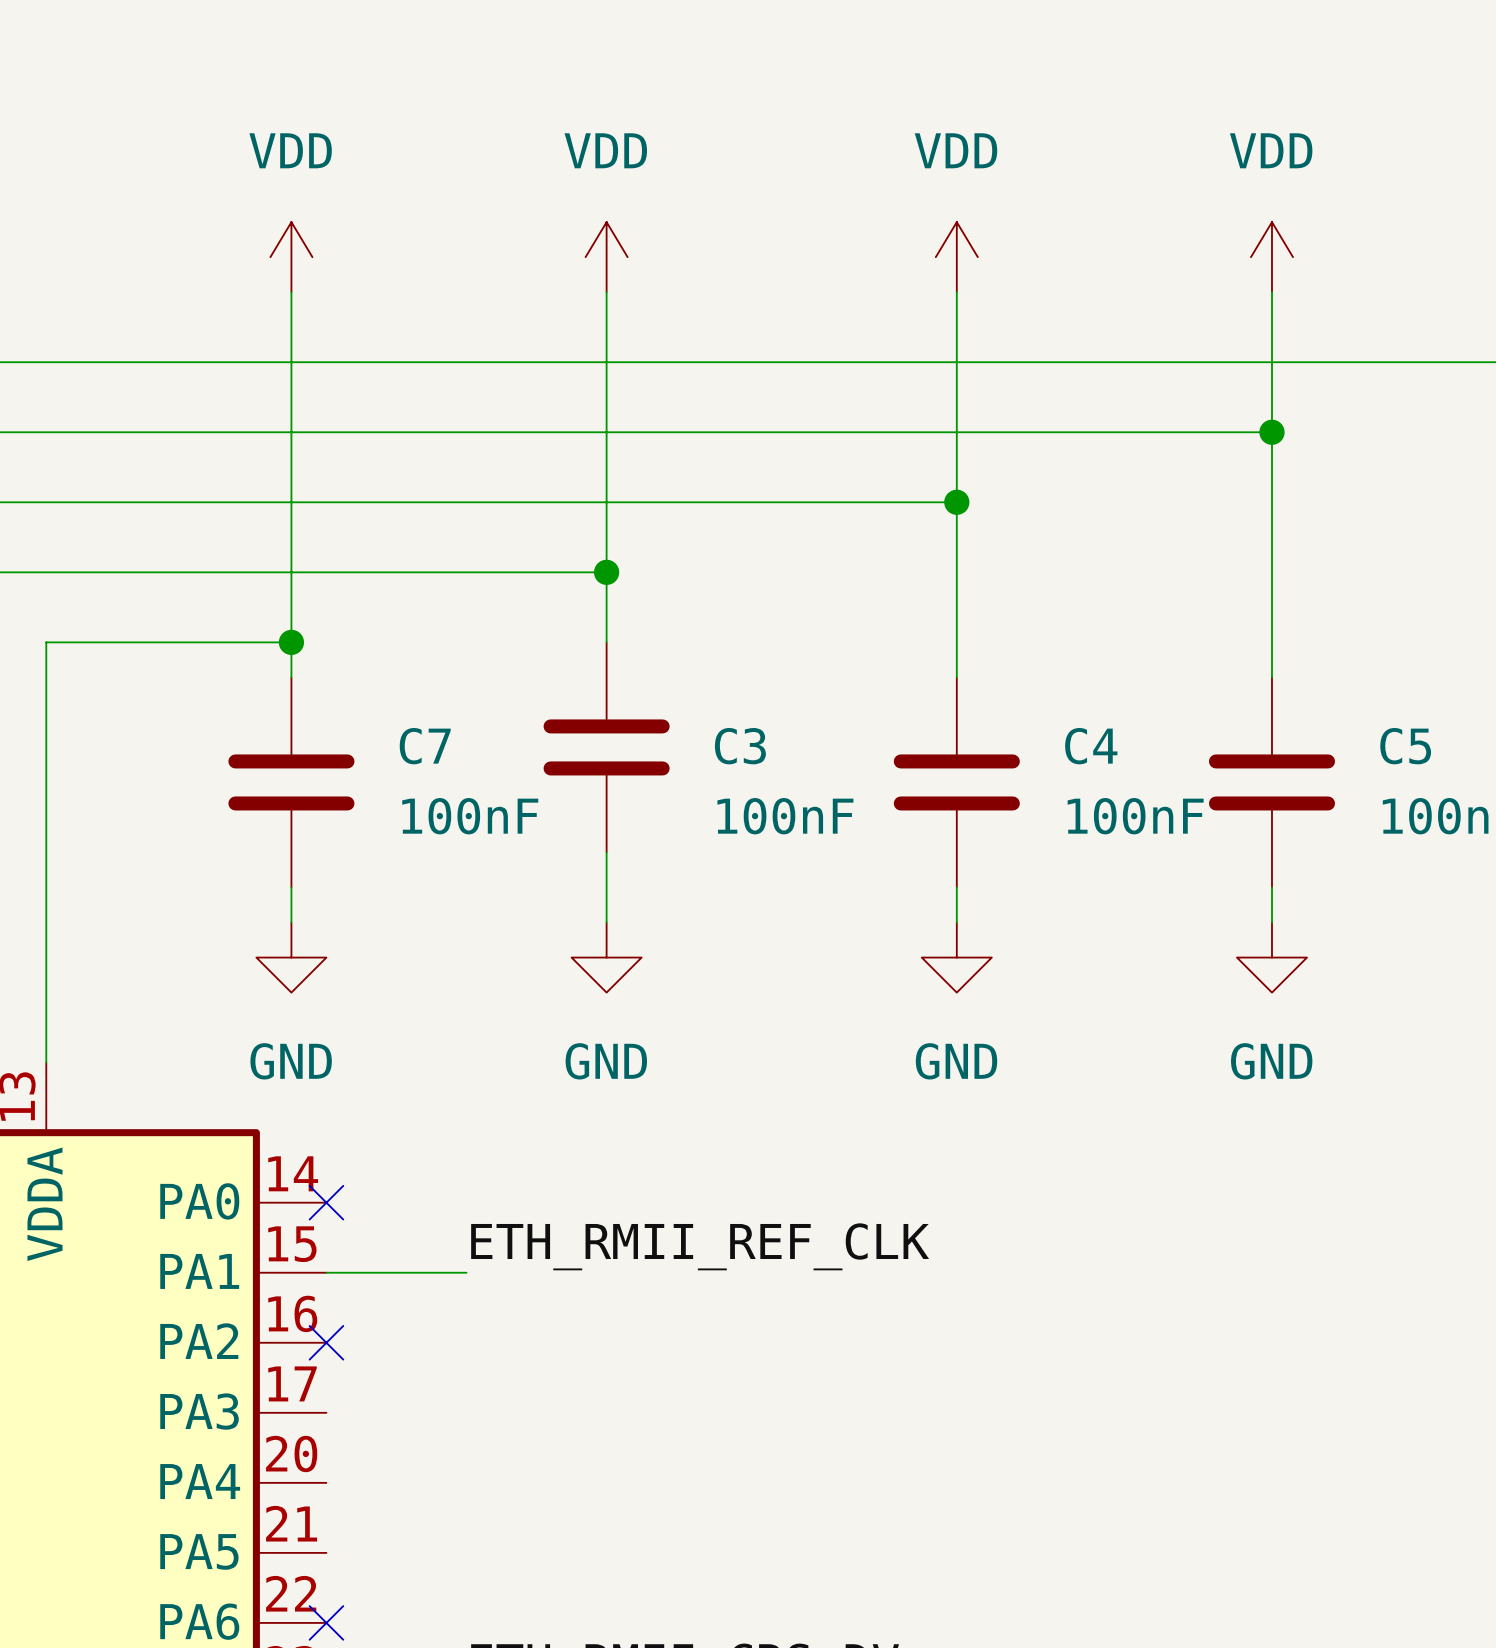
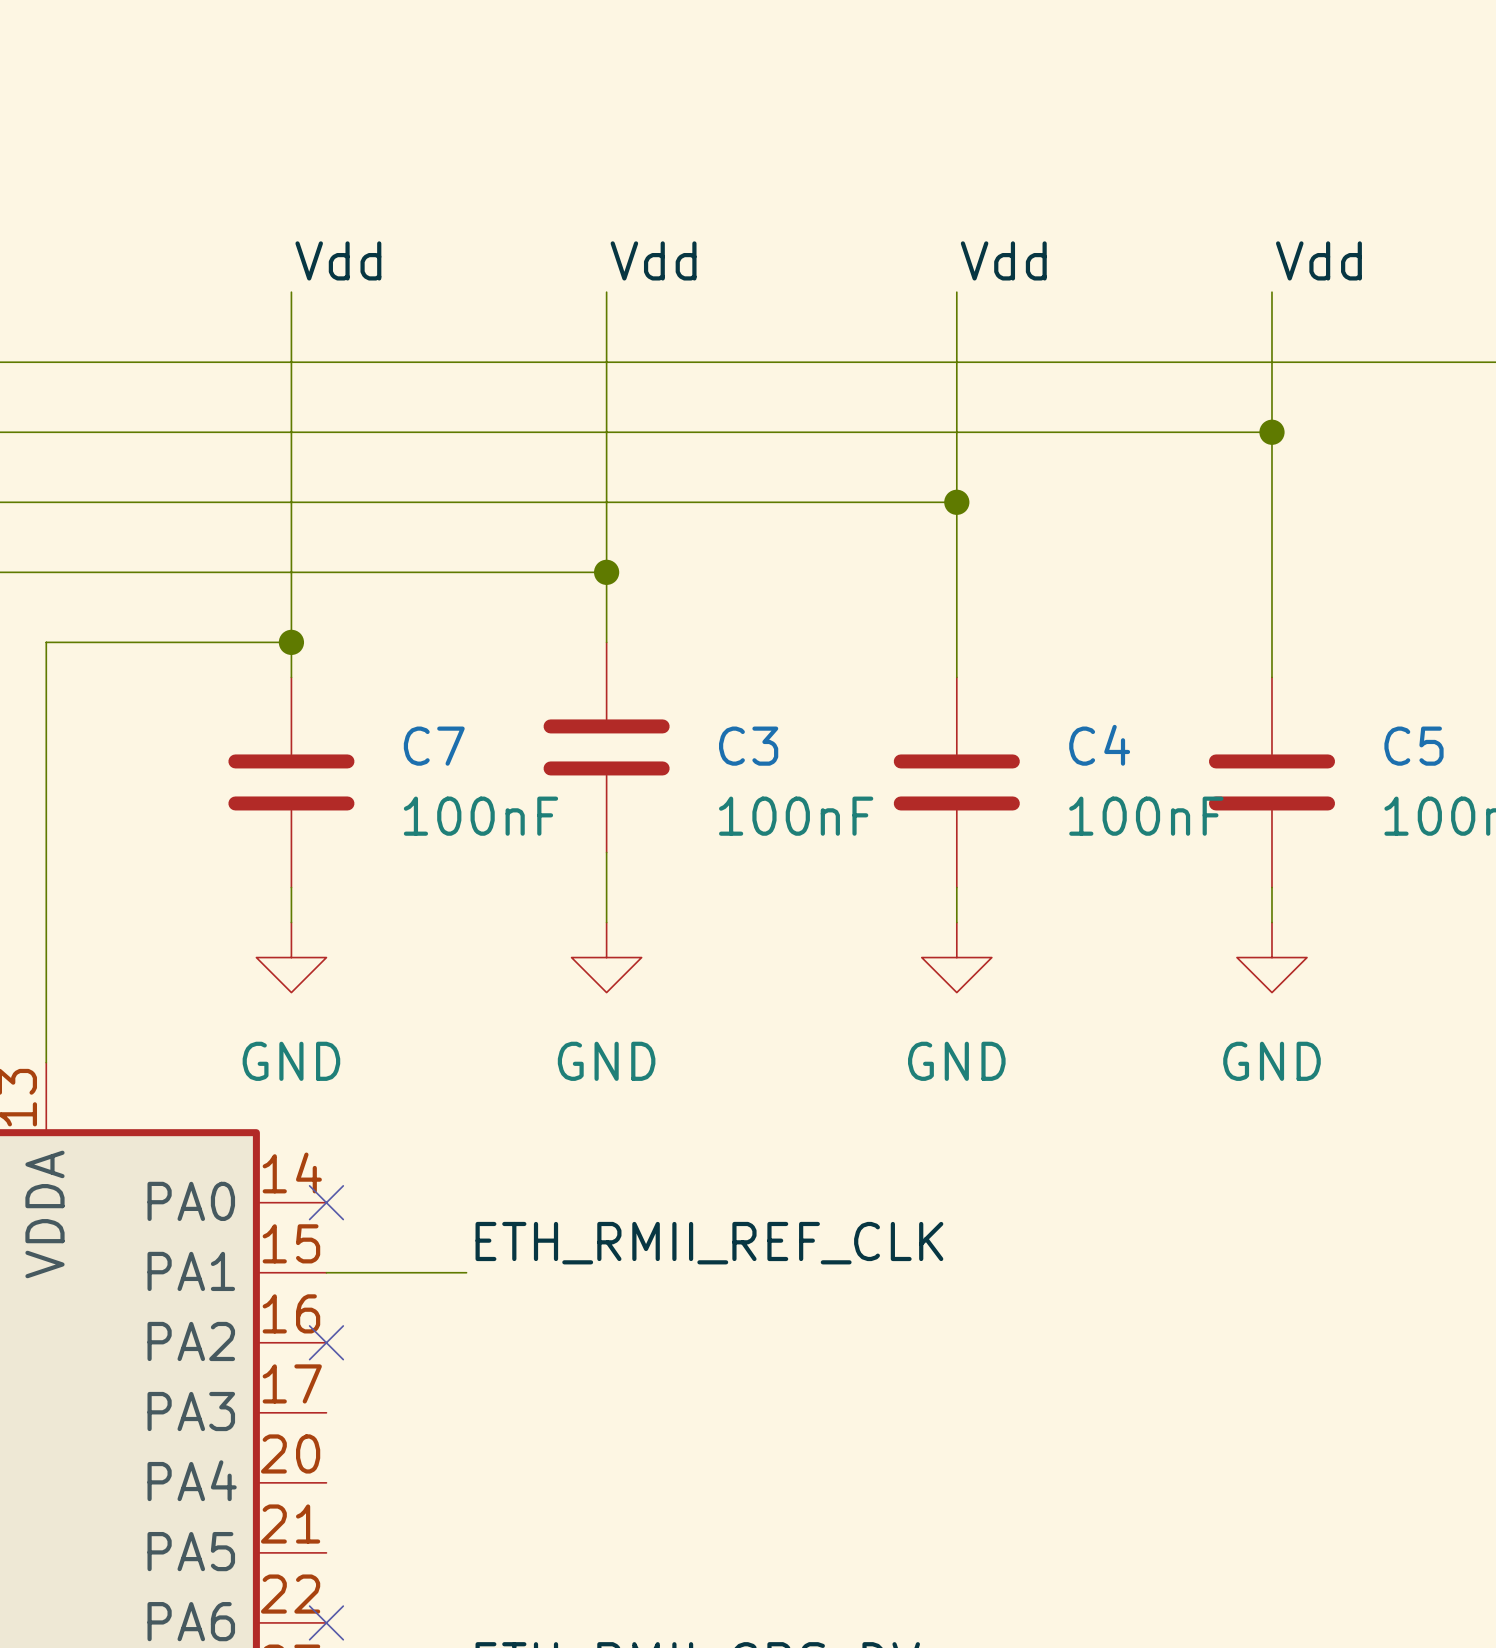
power symbol: VDD (291, 257) -> none
power symbol: VDD (606, 257) -> none
power symbol: VDD (956, 257) -> none
power symbol: VDD (1271, 257) -> none
label: none -> Vdd (338, 260)
label: none -> Vdd (653, 260)
label: none -> Vdd (1003, 260)
label: none -> Vdd (1318, 260)

